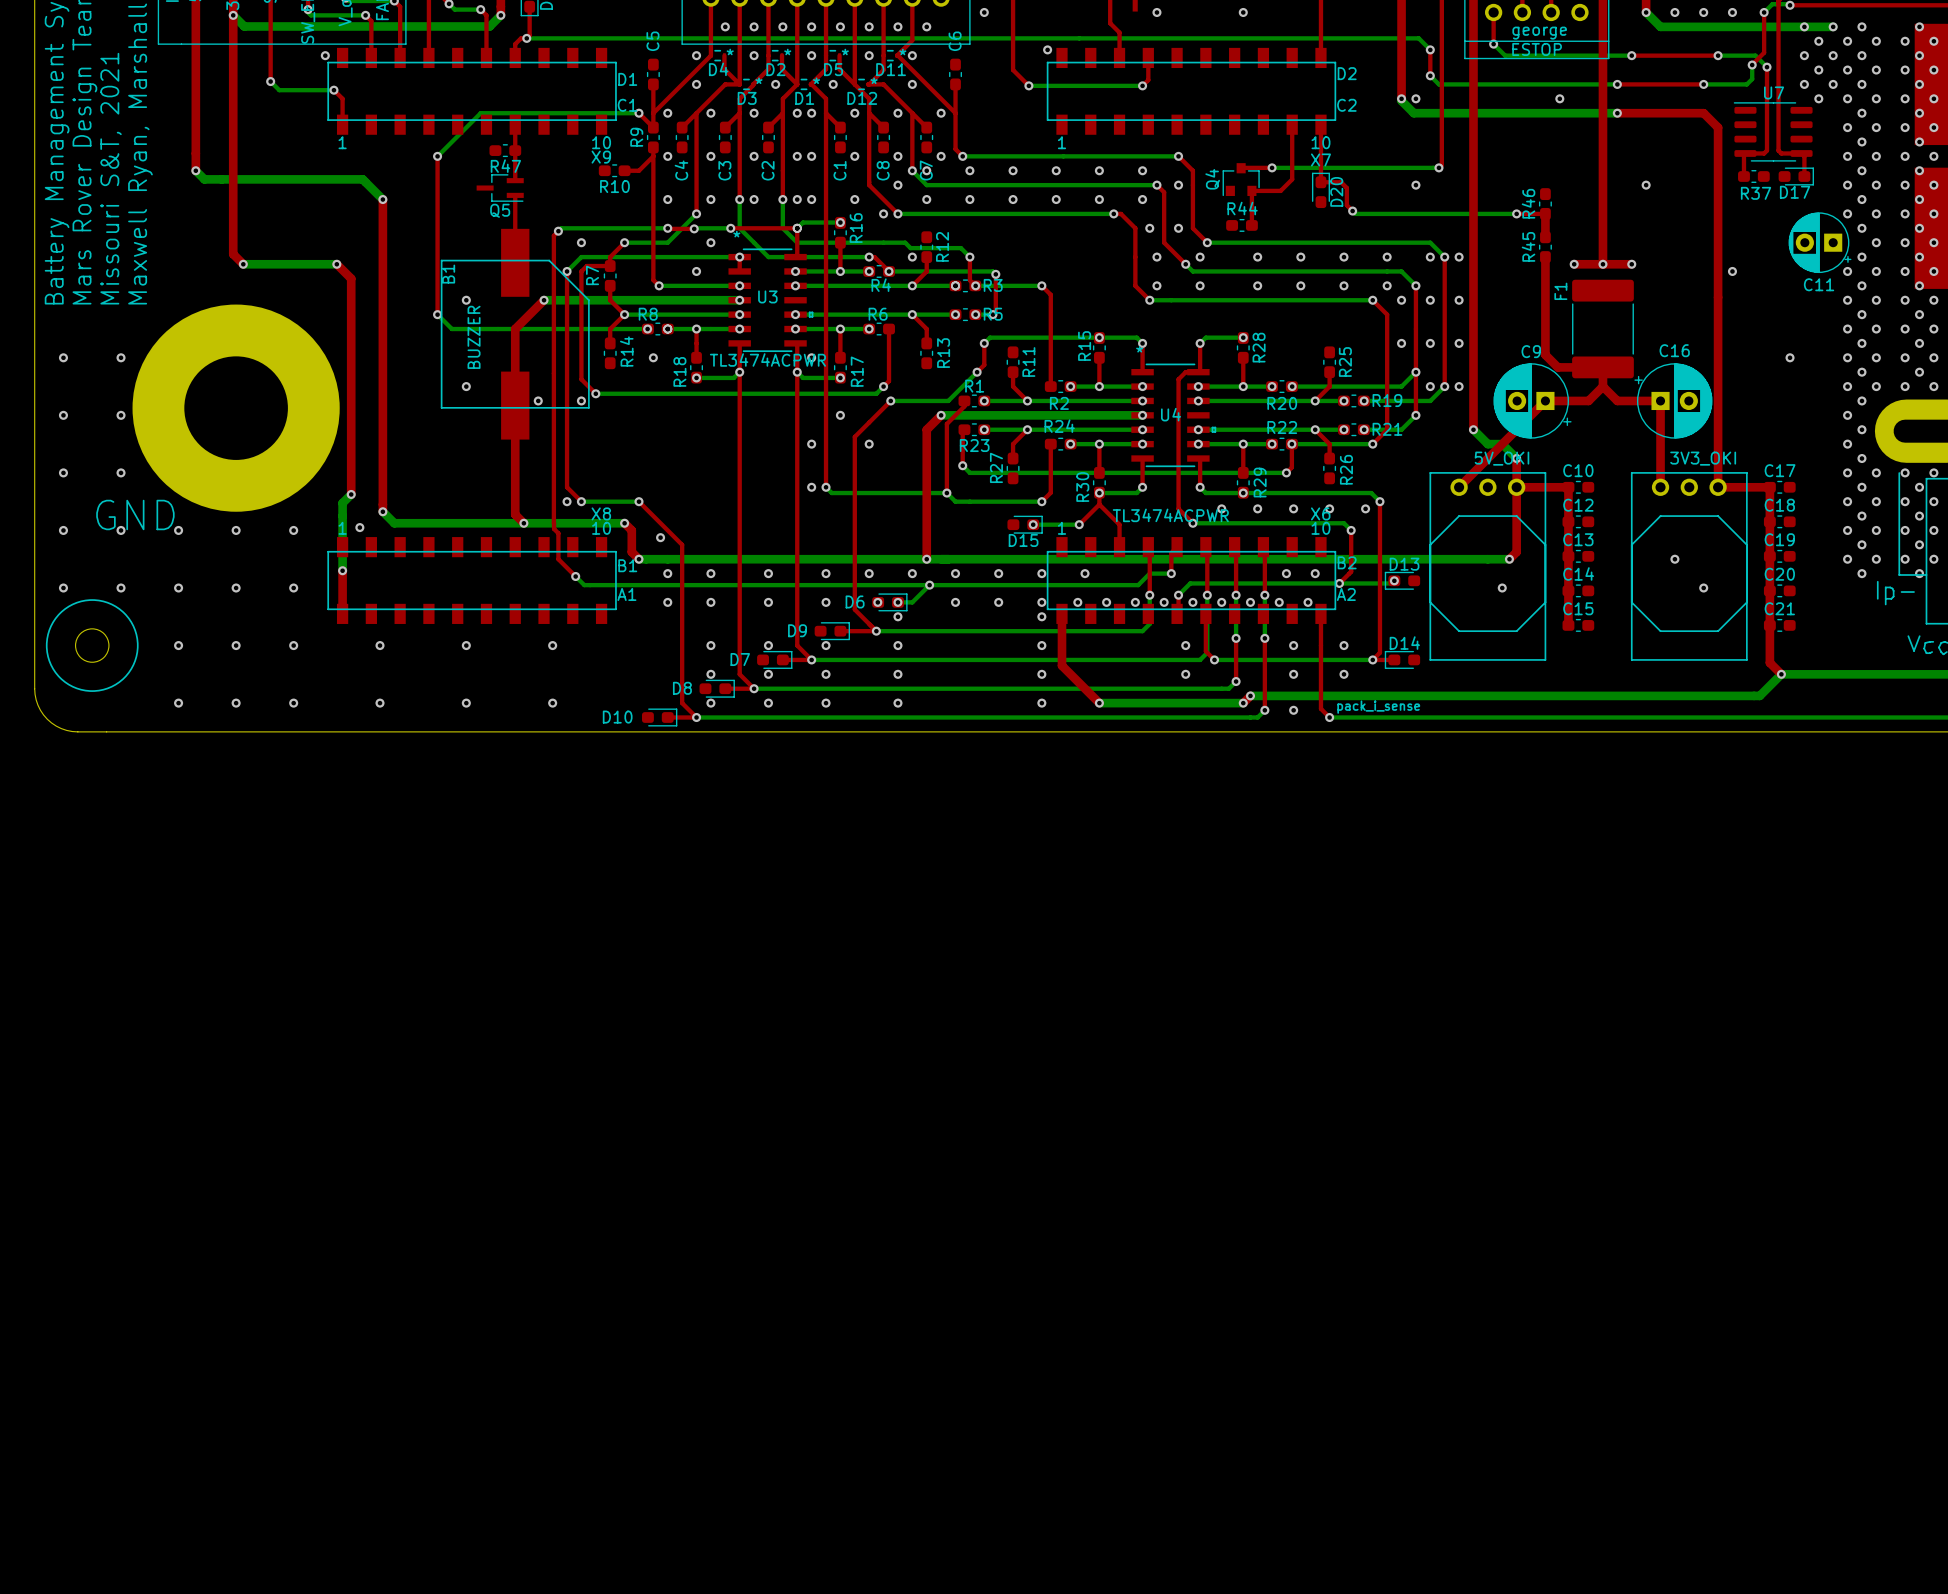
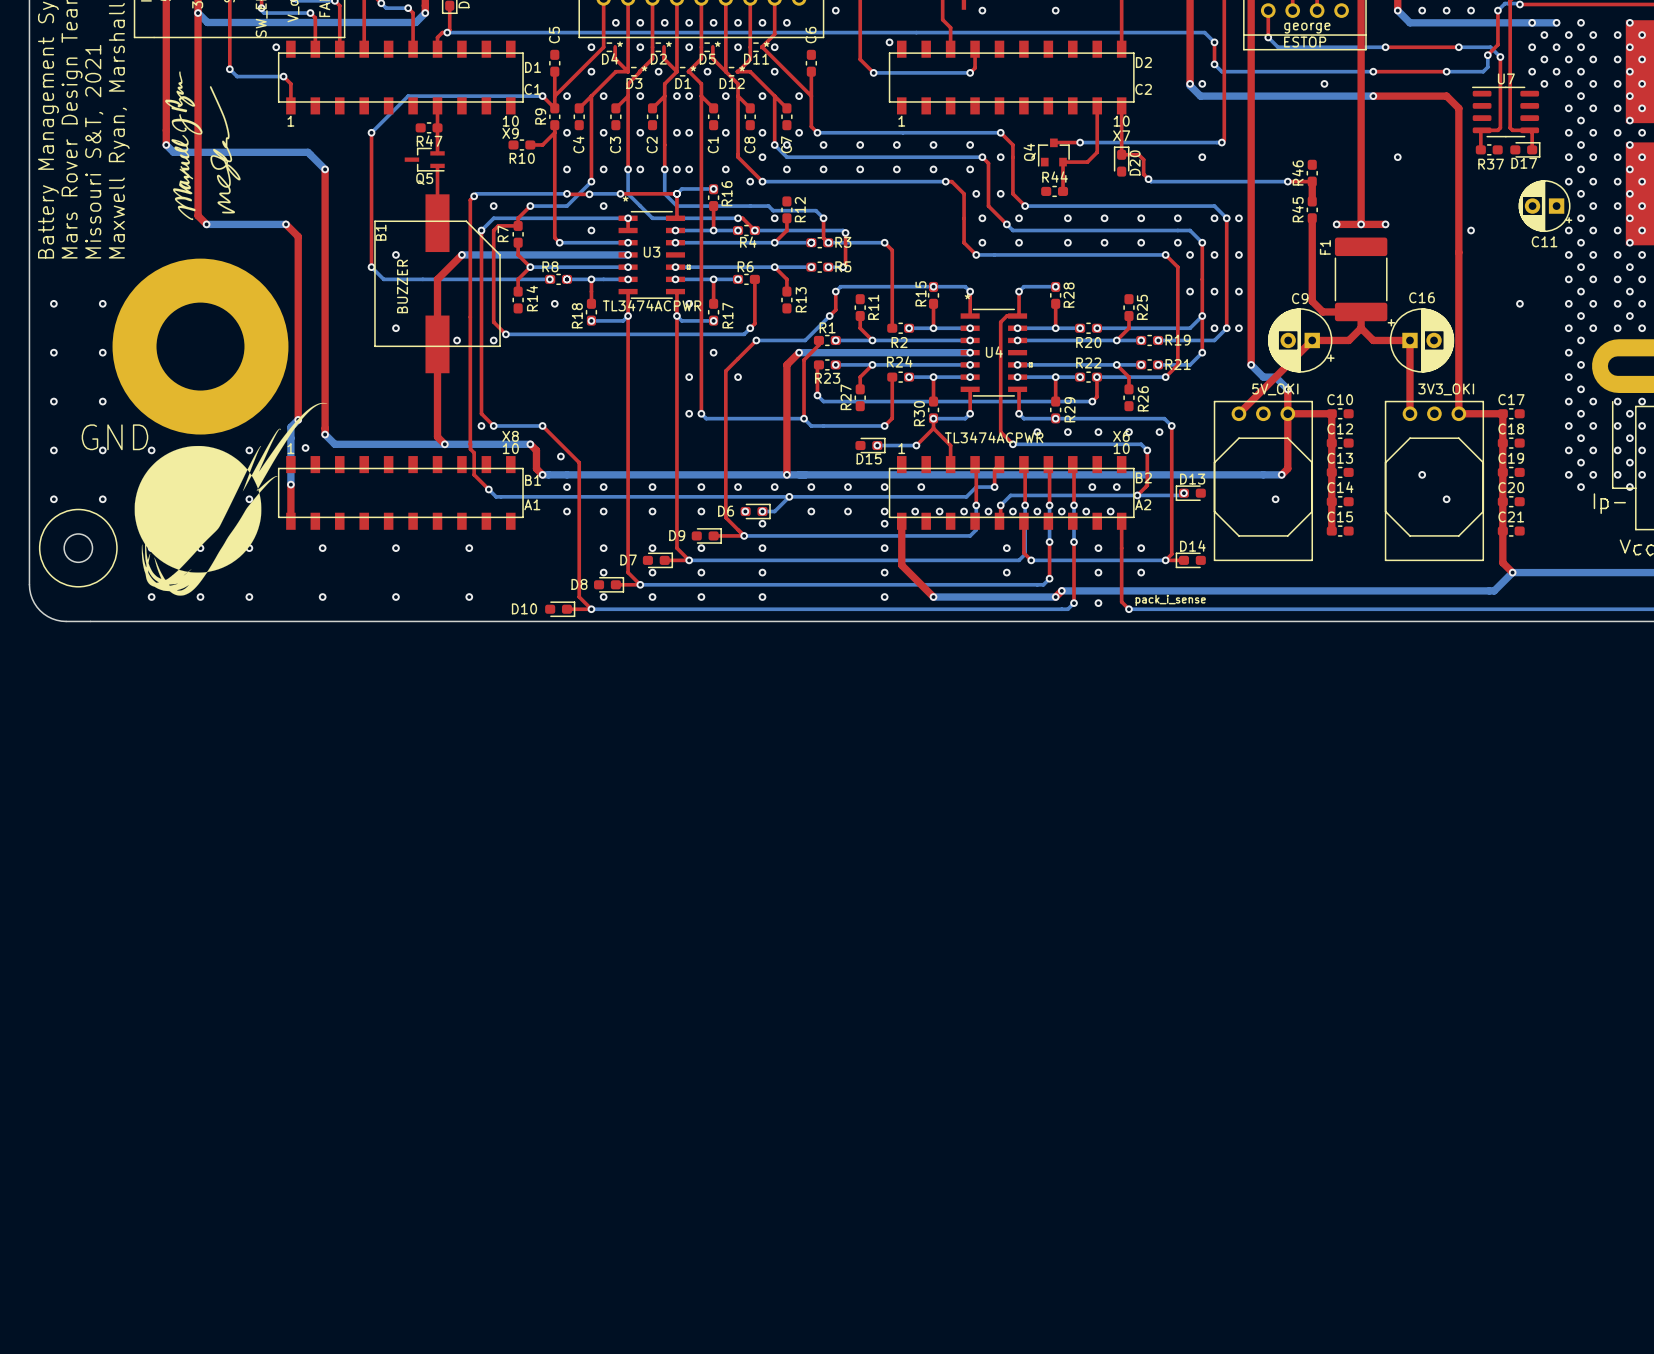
drawing: none -> [164, 71, 241, 221]
drawing: none -> [134, 402, 328, 596]

